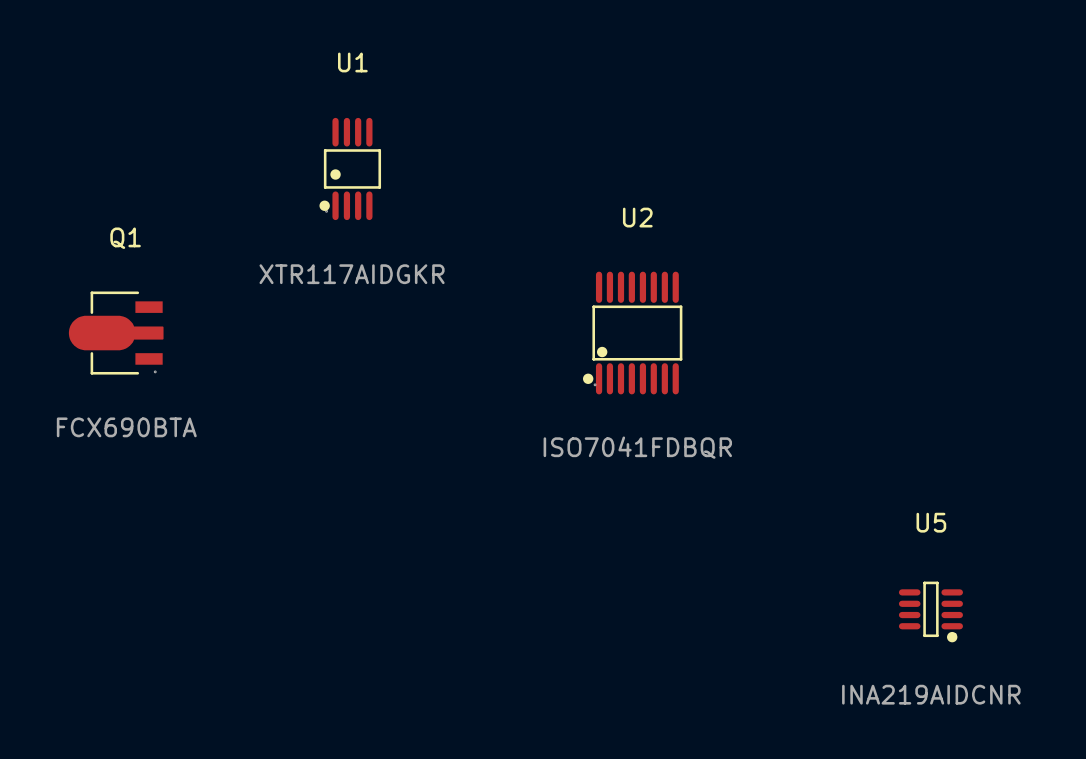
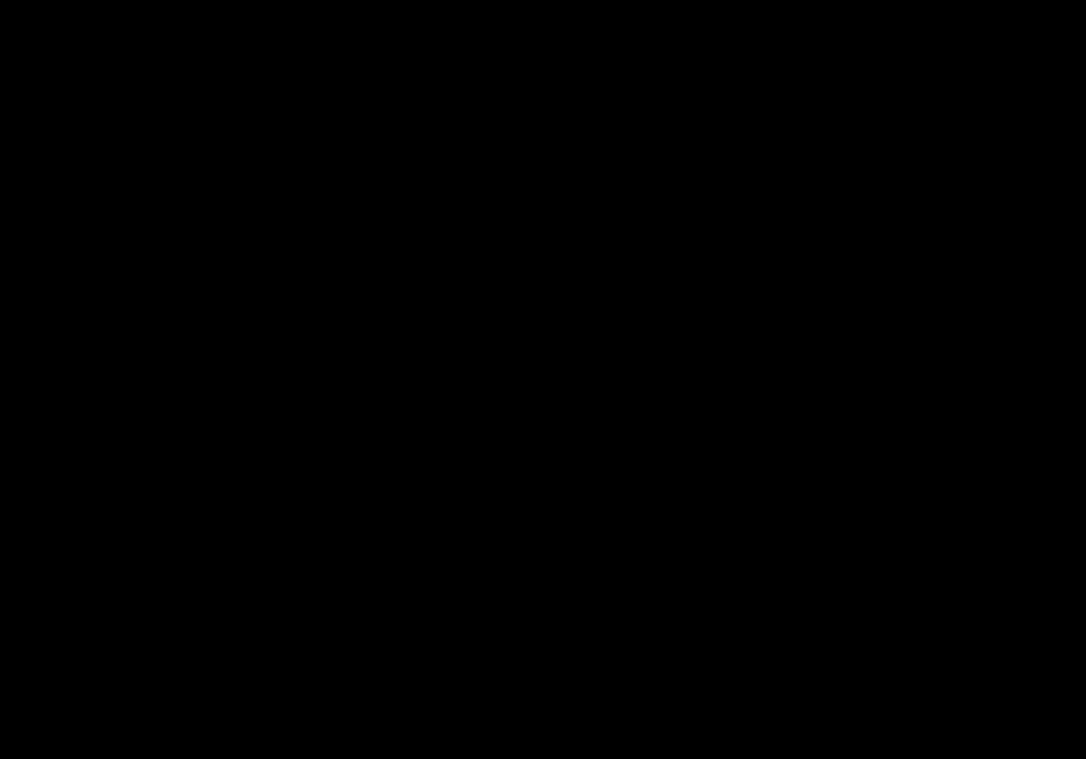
U1: XTR117AIDGKR (350, 168) -> none
Q1: FCX690BTA (116, 333) -> none
U2: ISO7041FDBQR (632, 333) -> none
U5: INA219AIDCNR (930, 611) -> none

